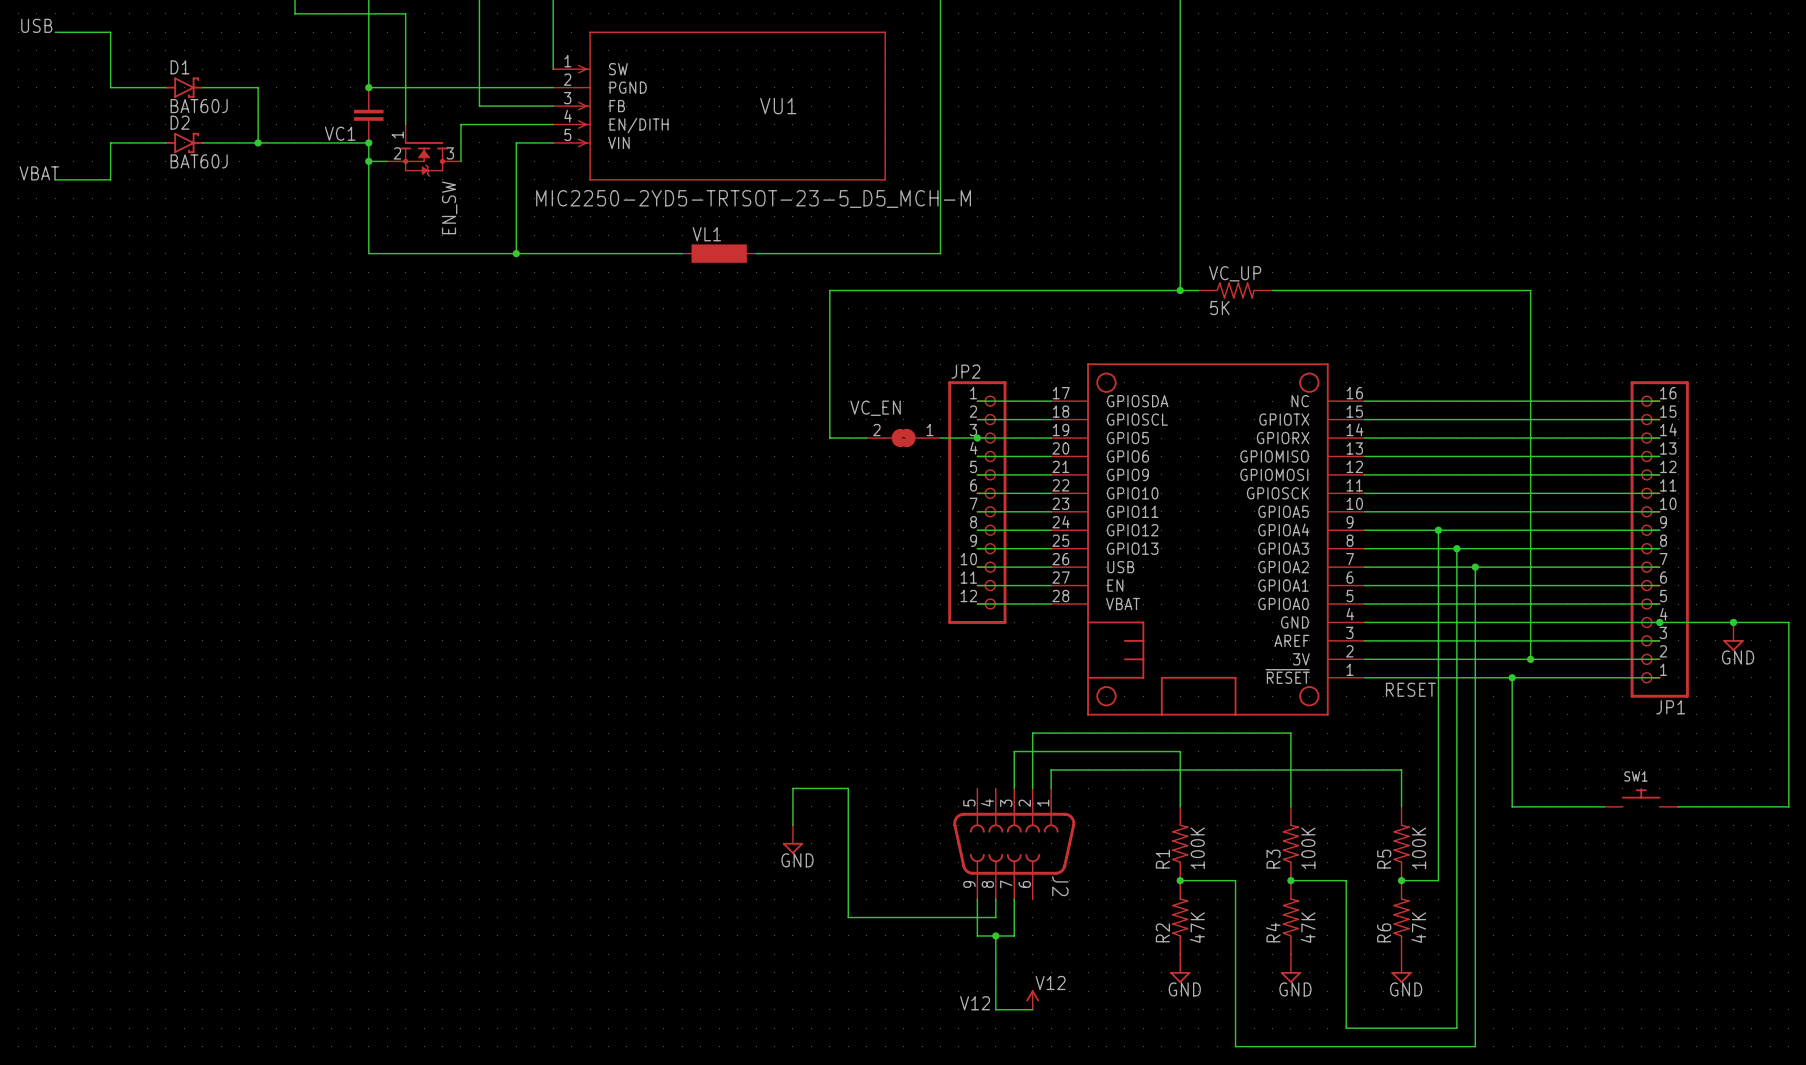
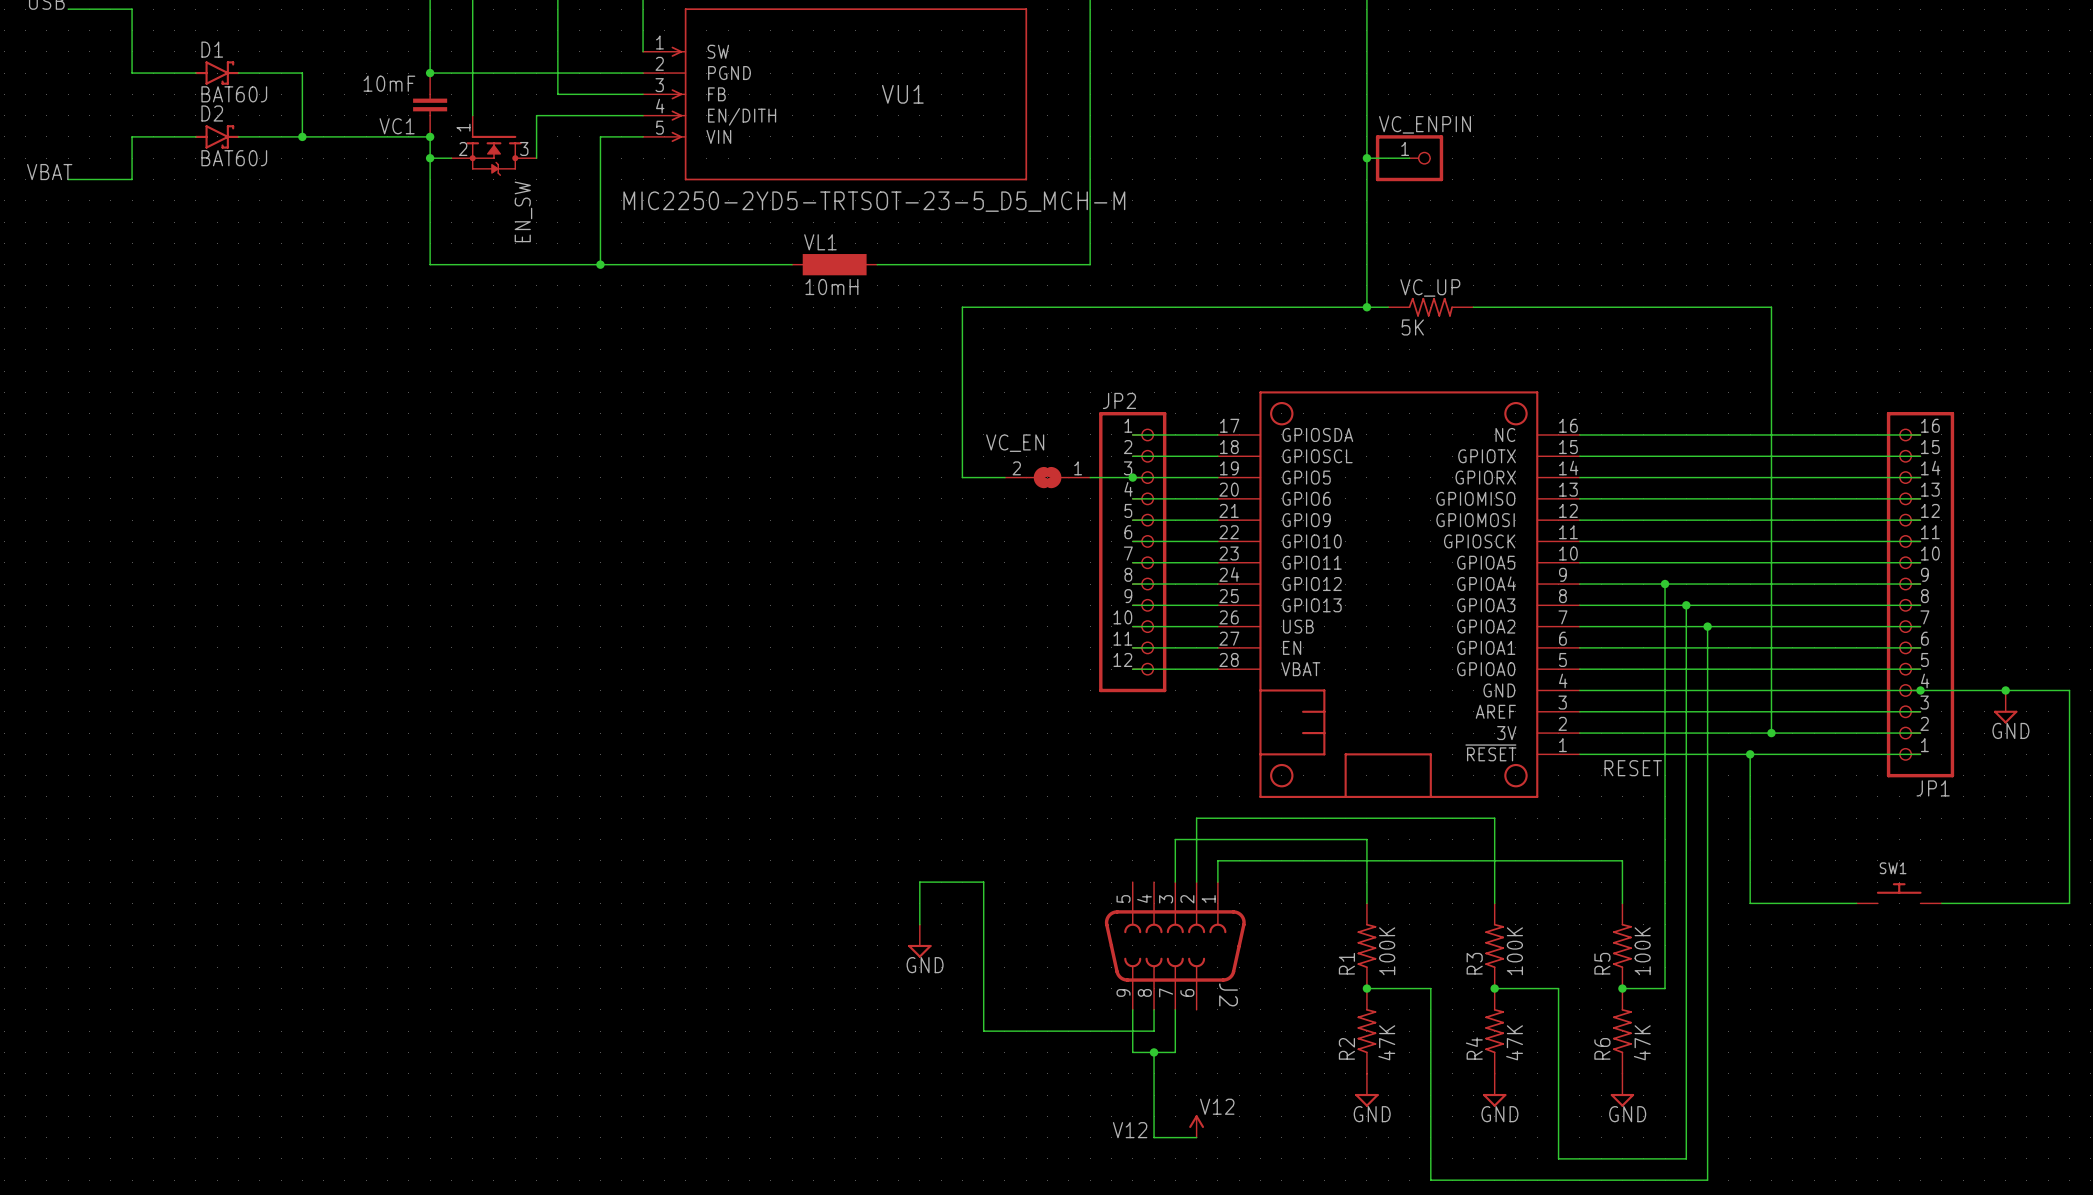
VC1 value: none -> 10mF (389, 83)
wire: none -> (1366, 158) (1409, 158)
junction: none -> (1366, 158)
VC_ENPIN: none -> (1409, 158)
VL1 value: none -> 10mH (831, 287)

